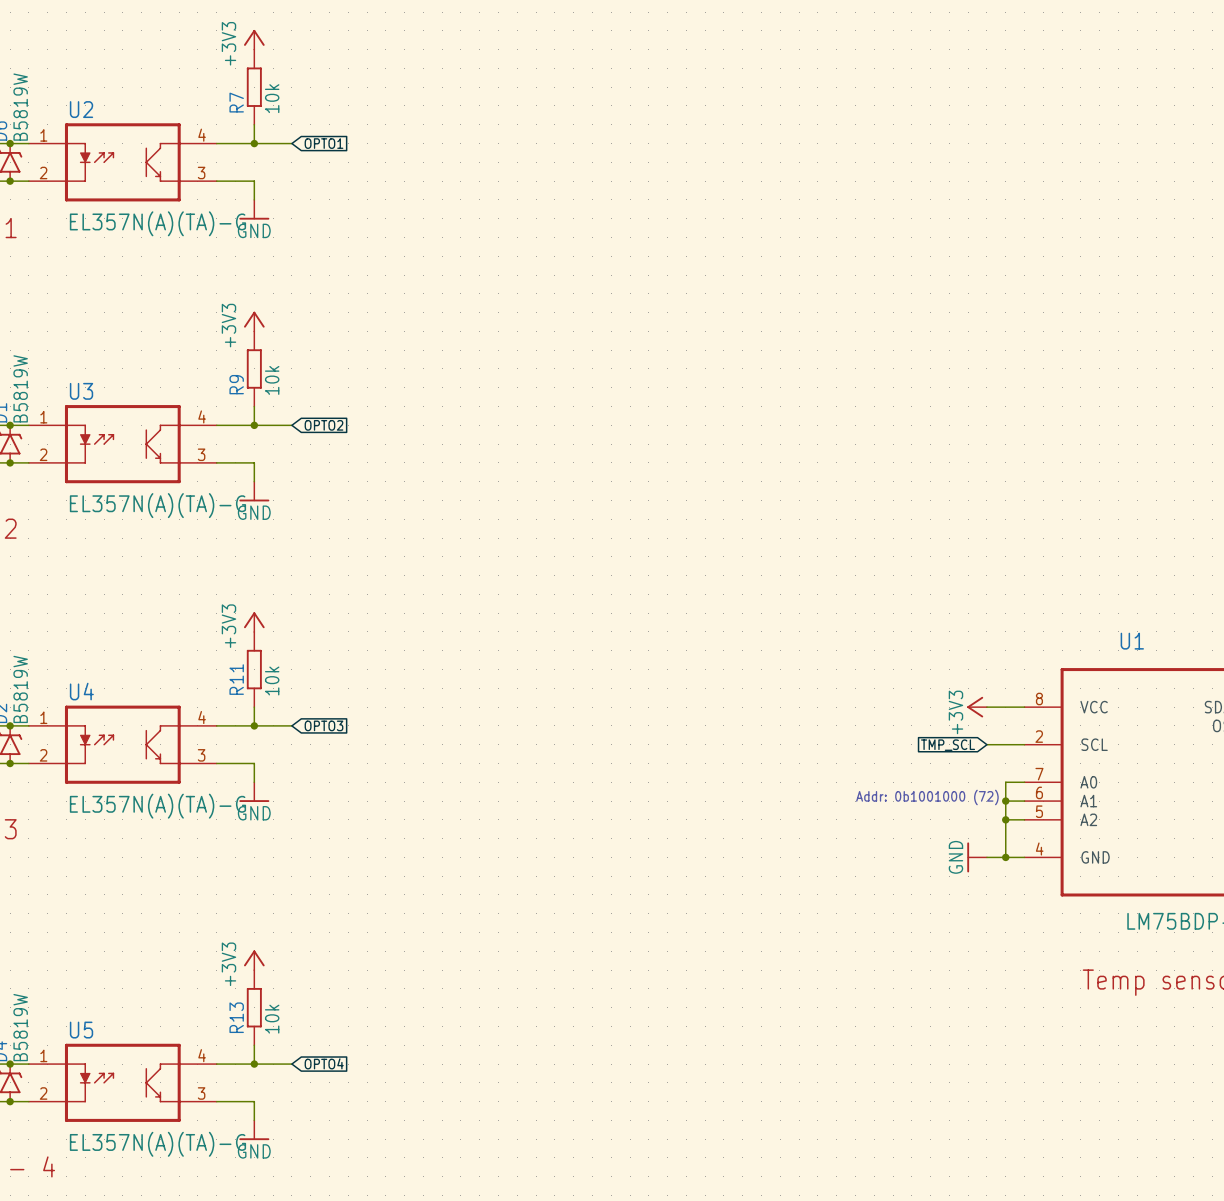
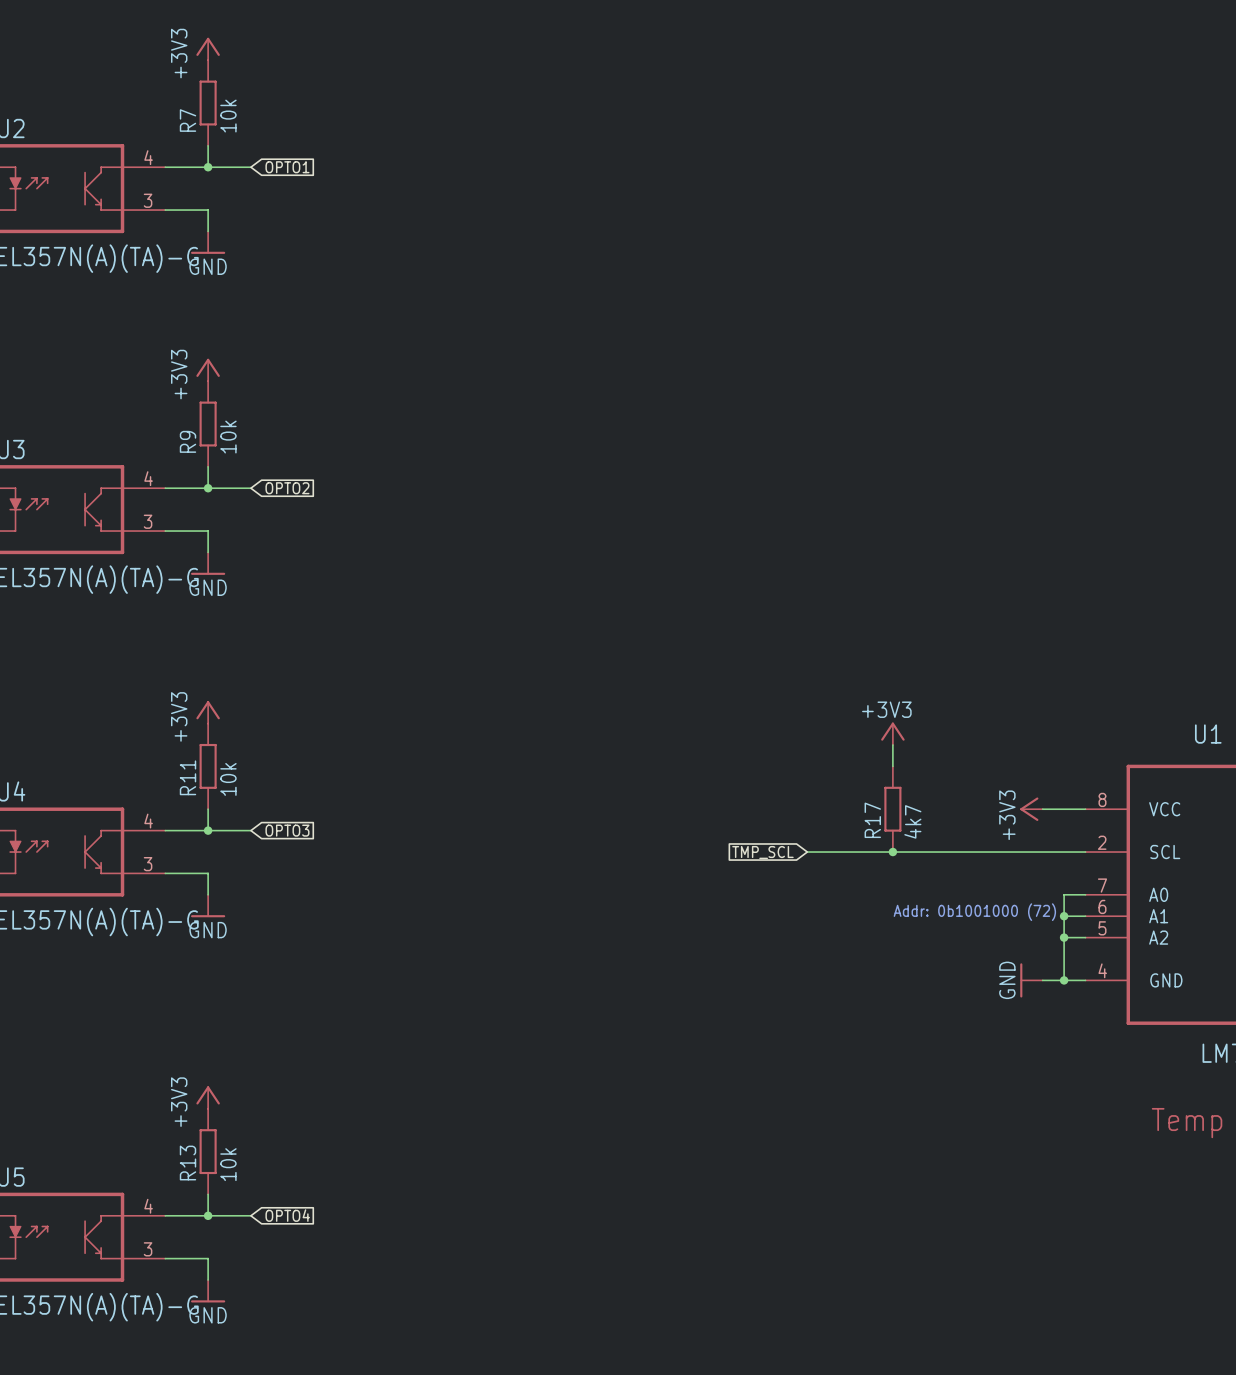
power symbol: none -> +3V3 (892, 733)
wire: none -> (892, 745) (892, 766)
R17: none -> 4k7 (892, 809)
wire: none -> (807, 852) (1042, 852)
junction: none -> (892, 852)
global label: none -> TMP_SCL (762, 852)
global label: TMP_SCL (948, 745) -> none

